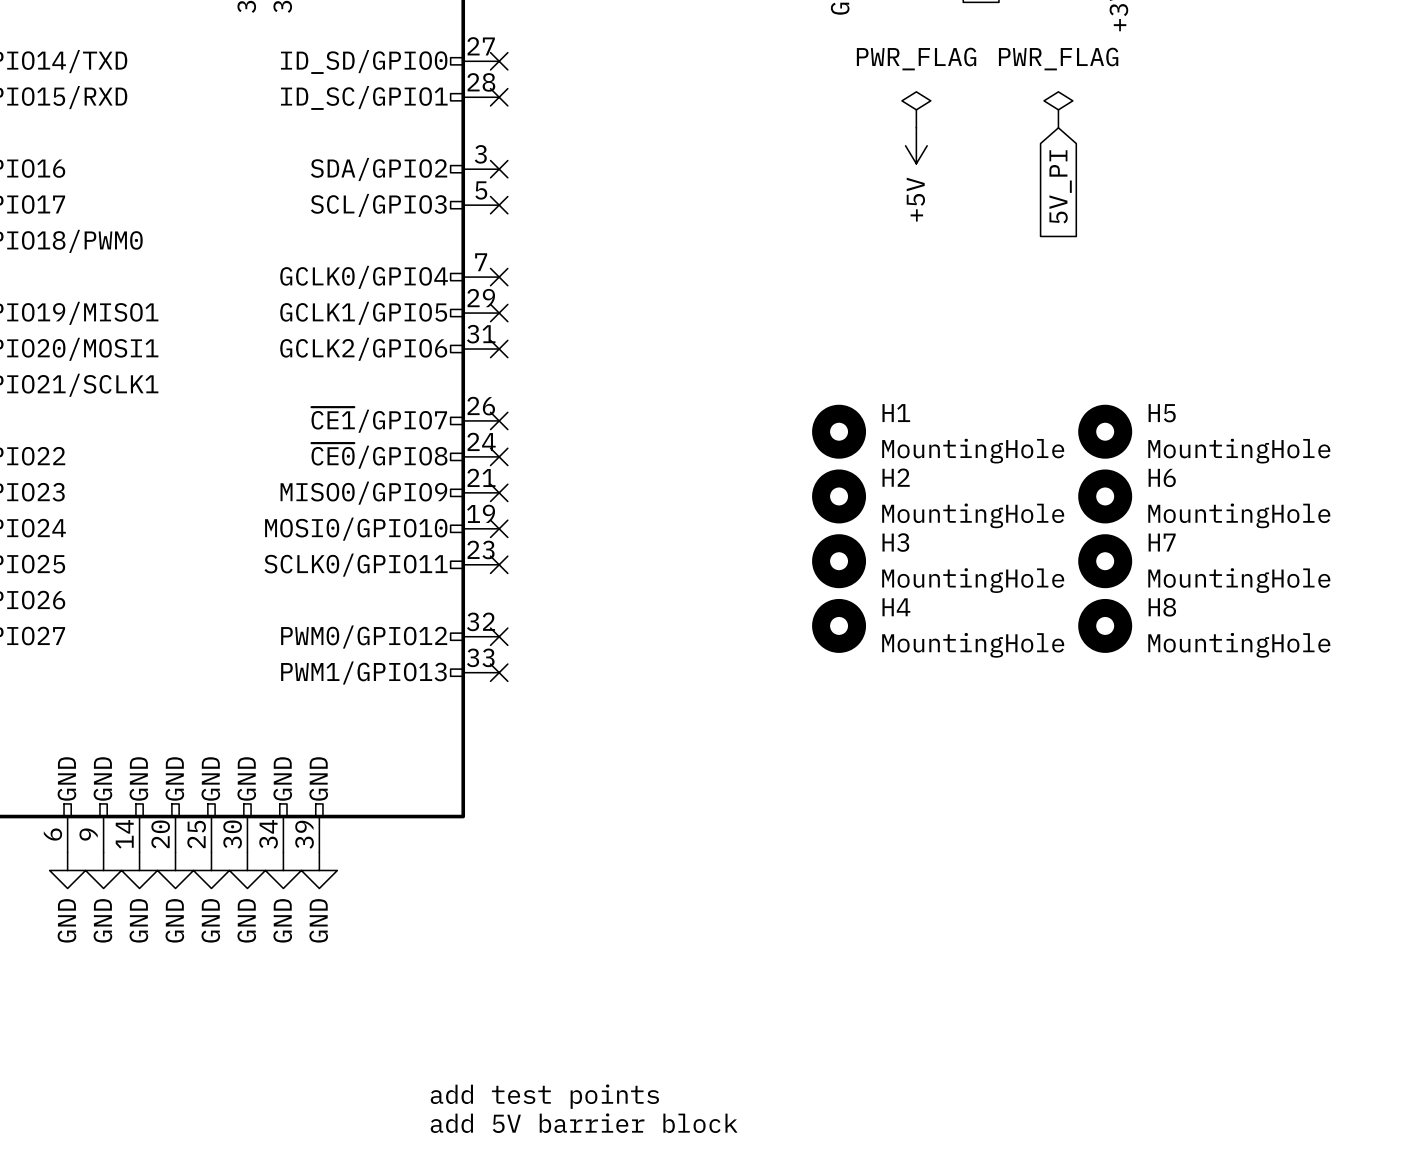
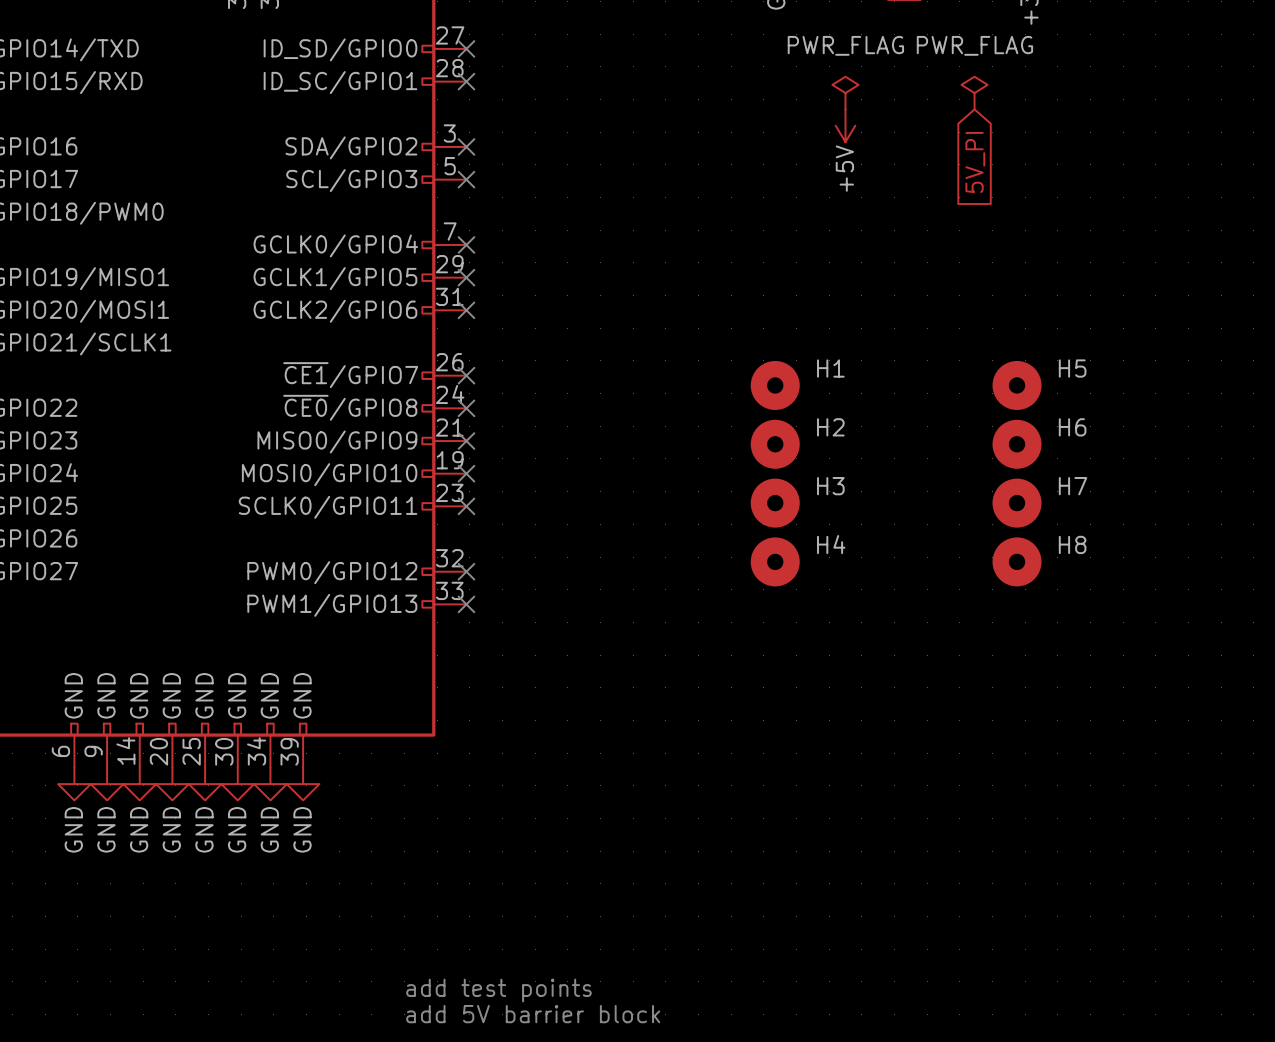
H1 value: MountingHole (973, 451) -> none
H5 value: MountingHole (1239, 451) -> none
H2 value: MountingHole (973, 515) -> none
H6 value: MountingHole (1239, 515) -> none
H3 value: MountingHole (973, 580) -> none
H7 value: MountingHole (1239, 580) -> none
H4 value: MountingHole (973, 645) -> none
H8 value: MountingHole (1239, 645) -> none

